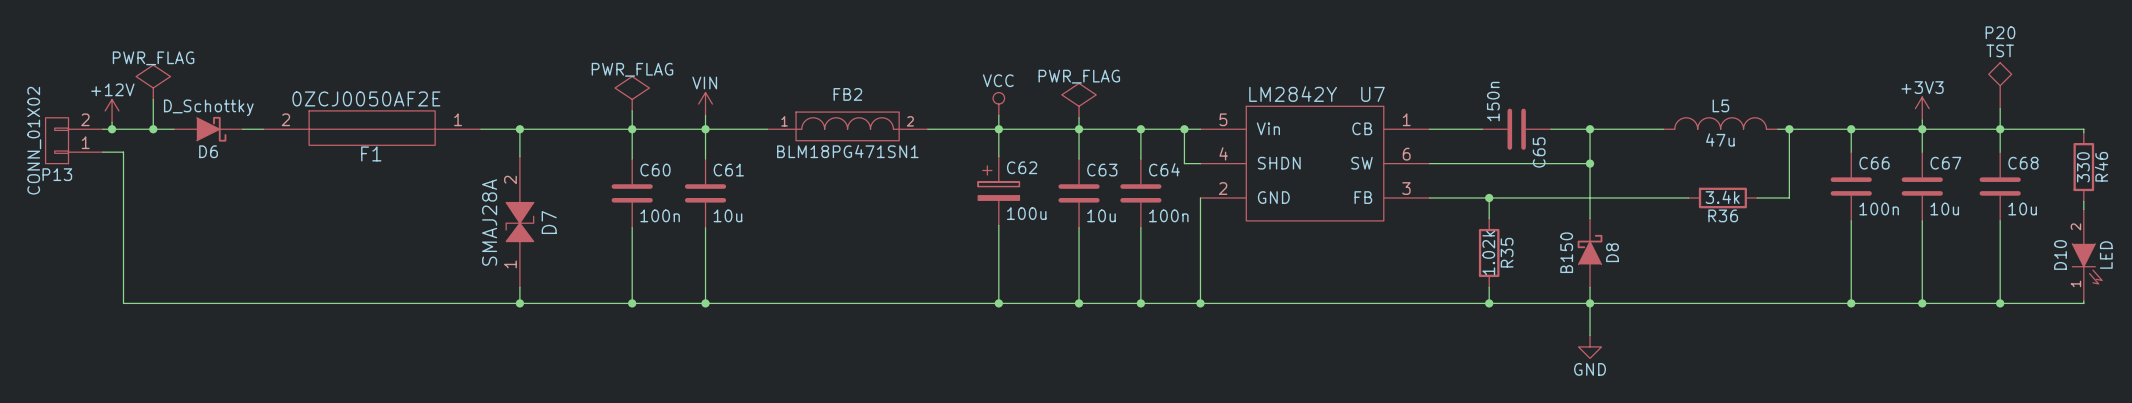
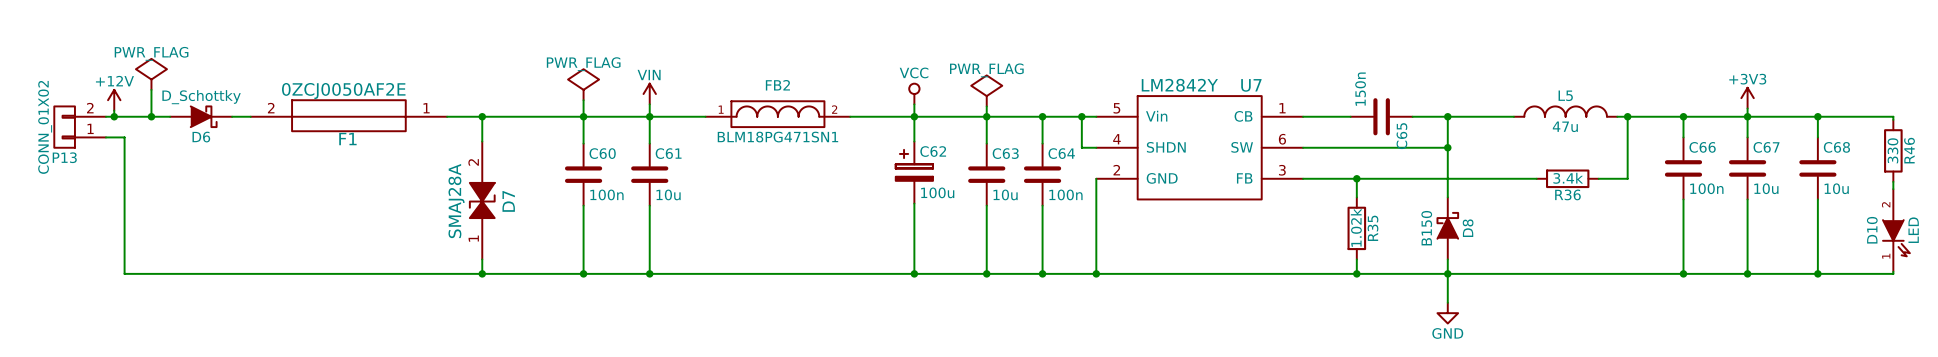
P20: TST (2000, 85) -> none
wire: (2000, 108) (2000, 129) -> none

